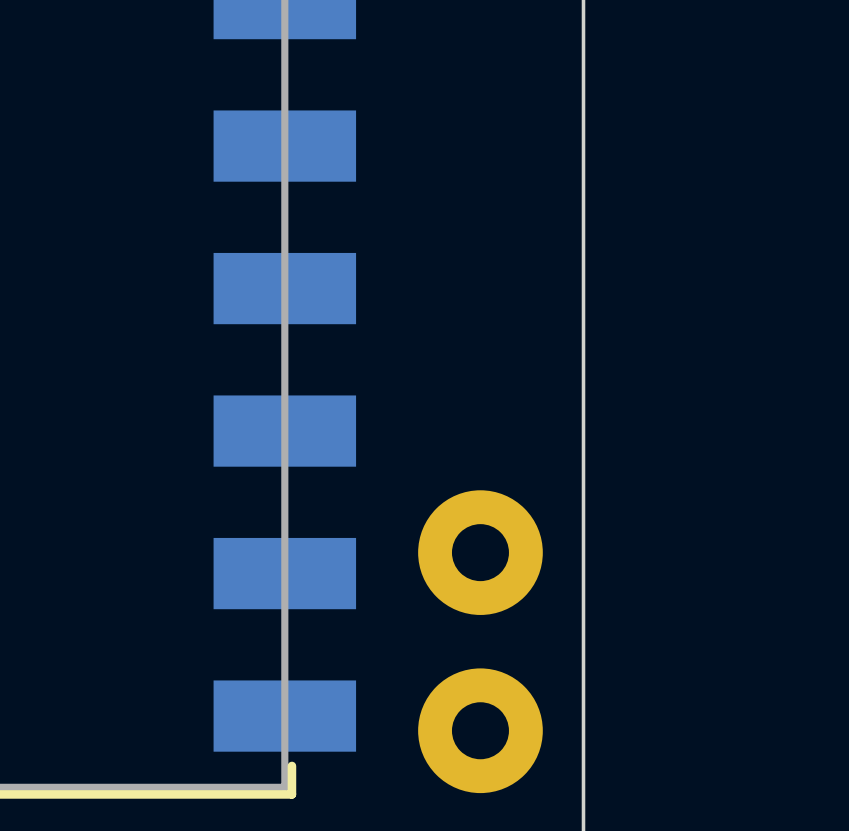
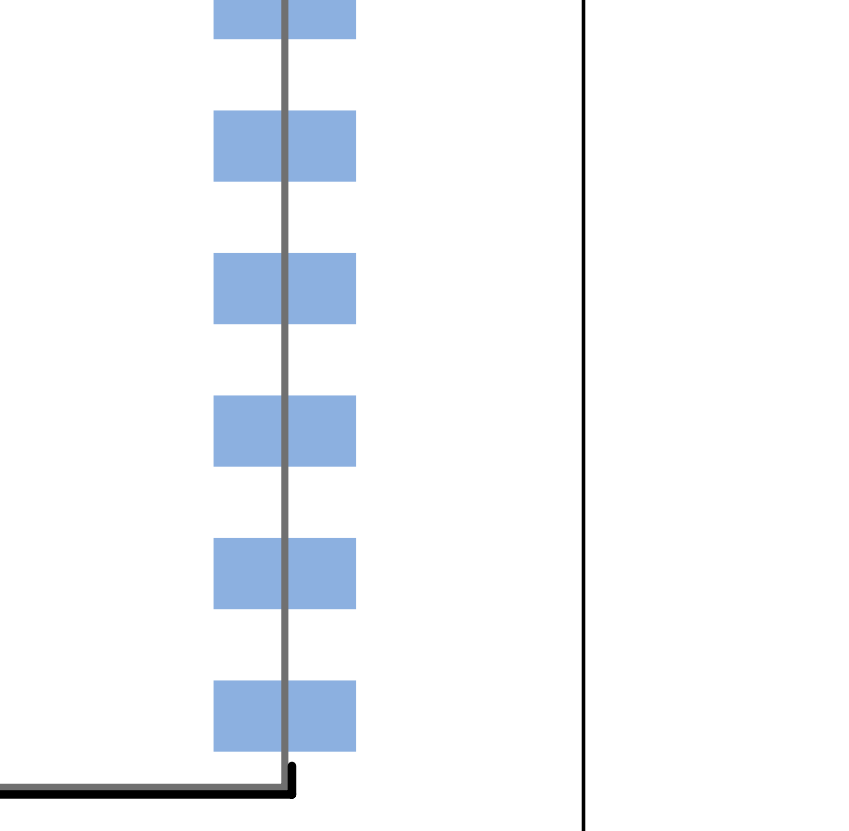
part: (480, 641) -> none

